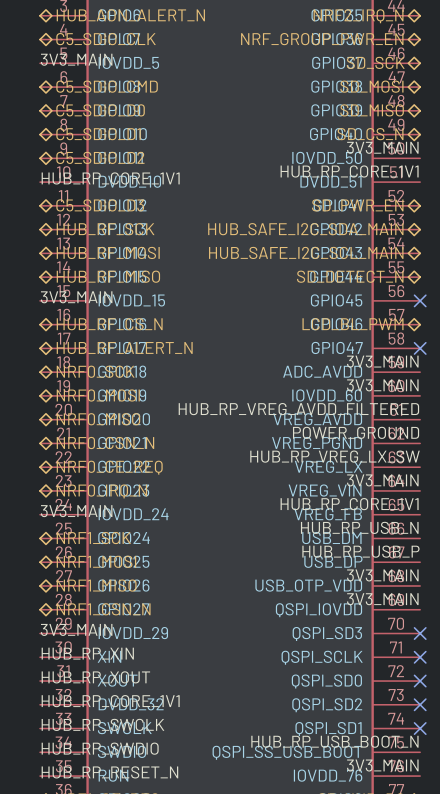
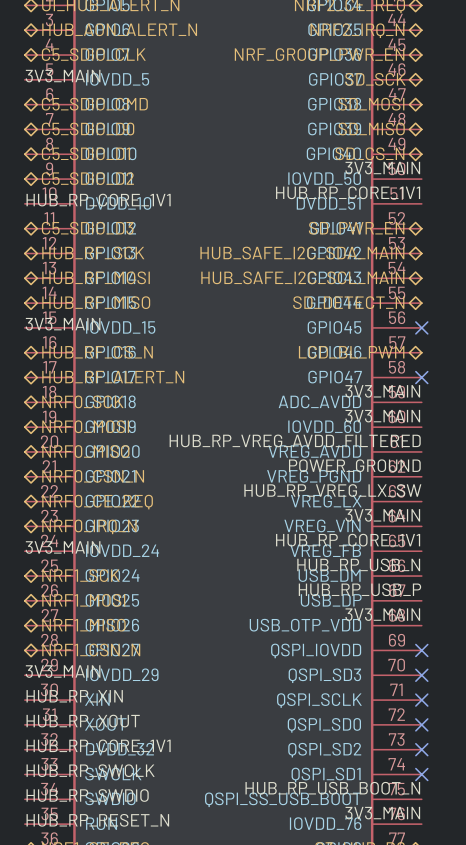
label: 3V3_MAIN (382, 599) -> none
no-connect mark: none -> (421, 650)

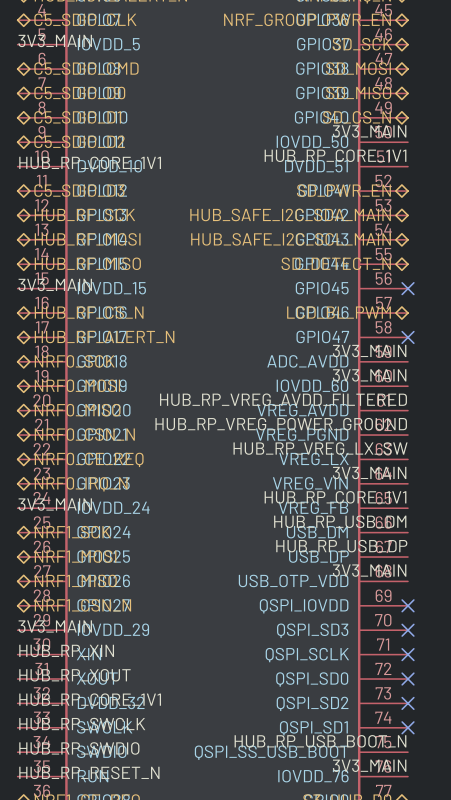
label: POWER_GROUND (354, 465) -> HUB_RP_VREG_POWER_GROUND (281, 424)
label: HUB_RP_USB_N (358, 564) -> HUB_RP_USB_DM (340, 521)
label: HUB_RP_USB_P (359, 589) -> HUB_RP_USB_DP (341, 546)

